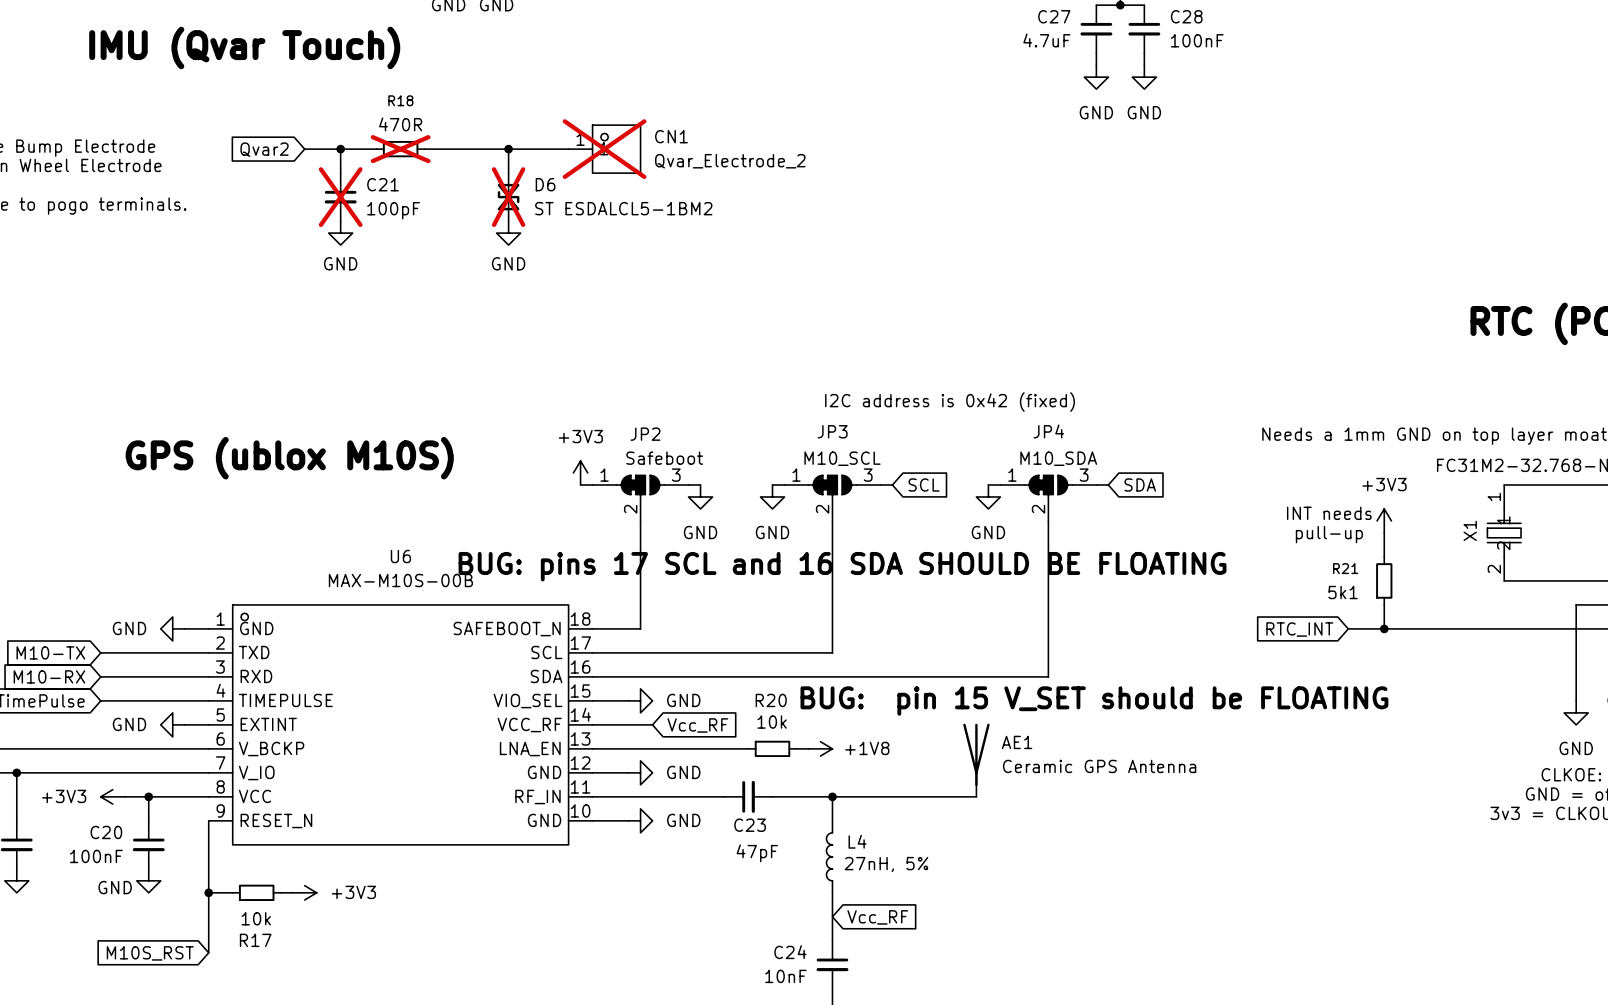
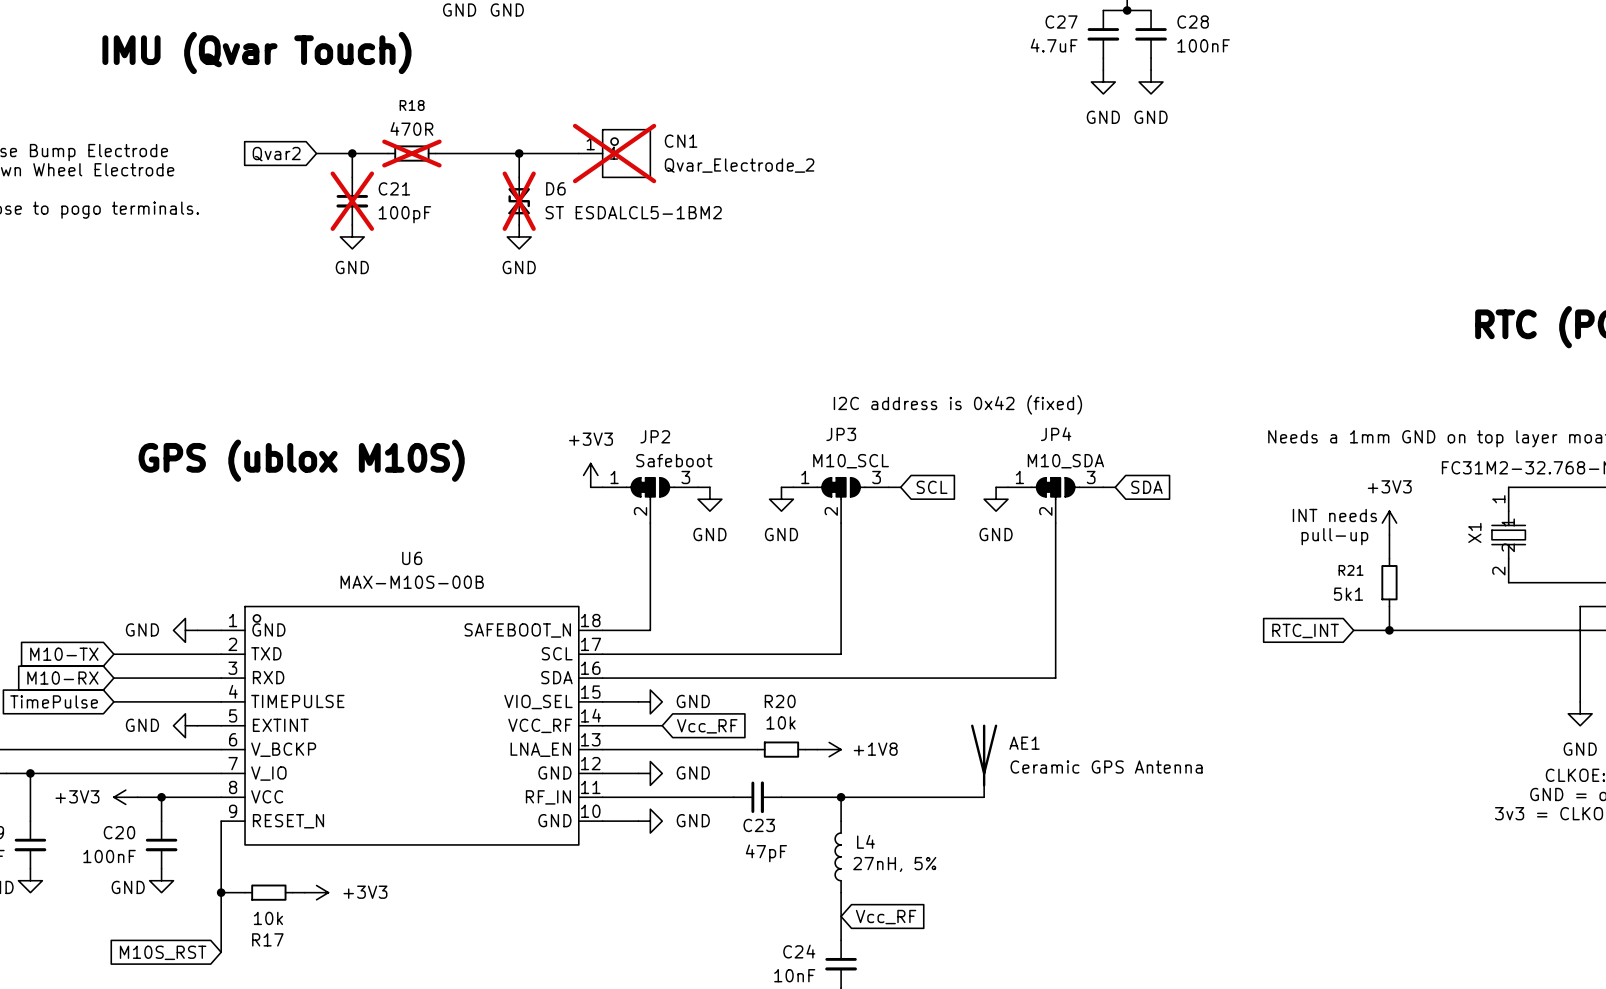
text: BUG: pins 17 SCL and 16 SDA SHOULD BE FLOATING (842, 566) -> none
text: BUG: pin 15 V_SET should be FLOATING (1094, 701) -> none

